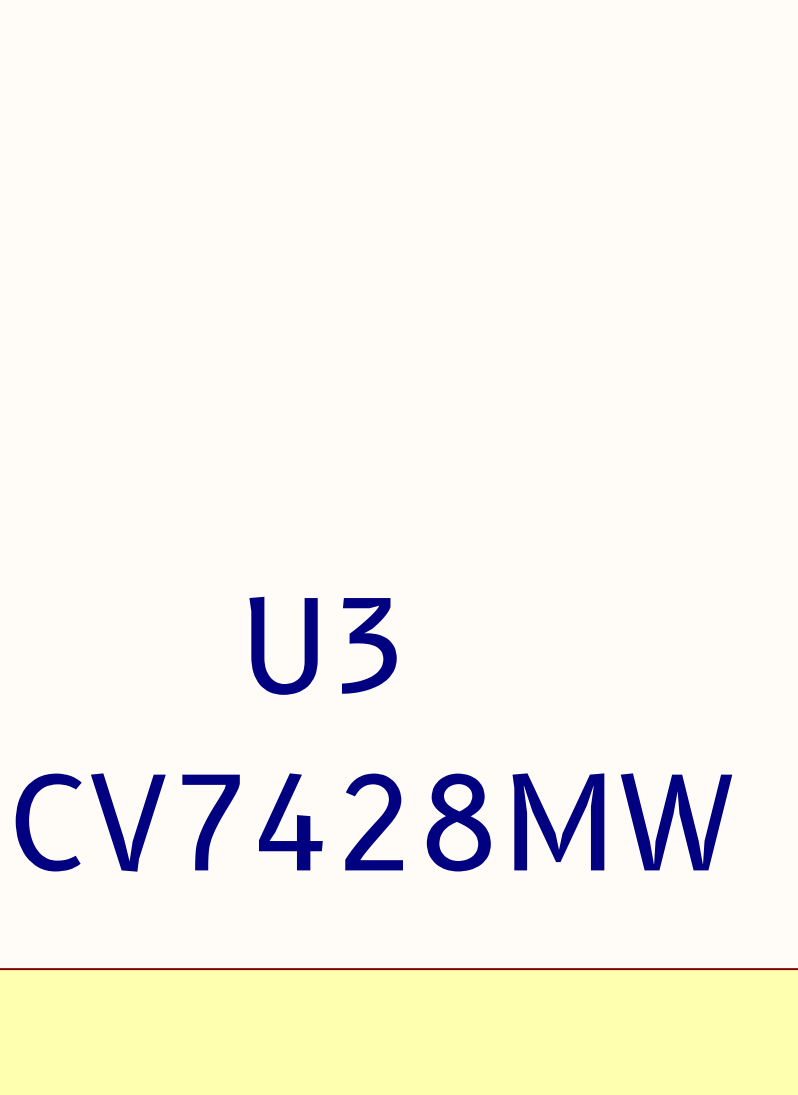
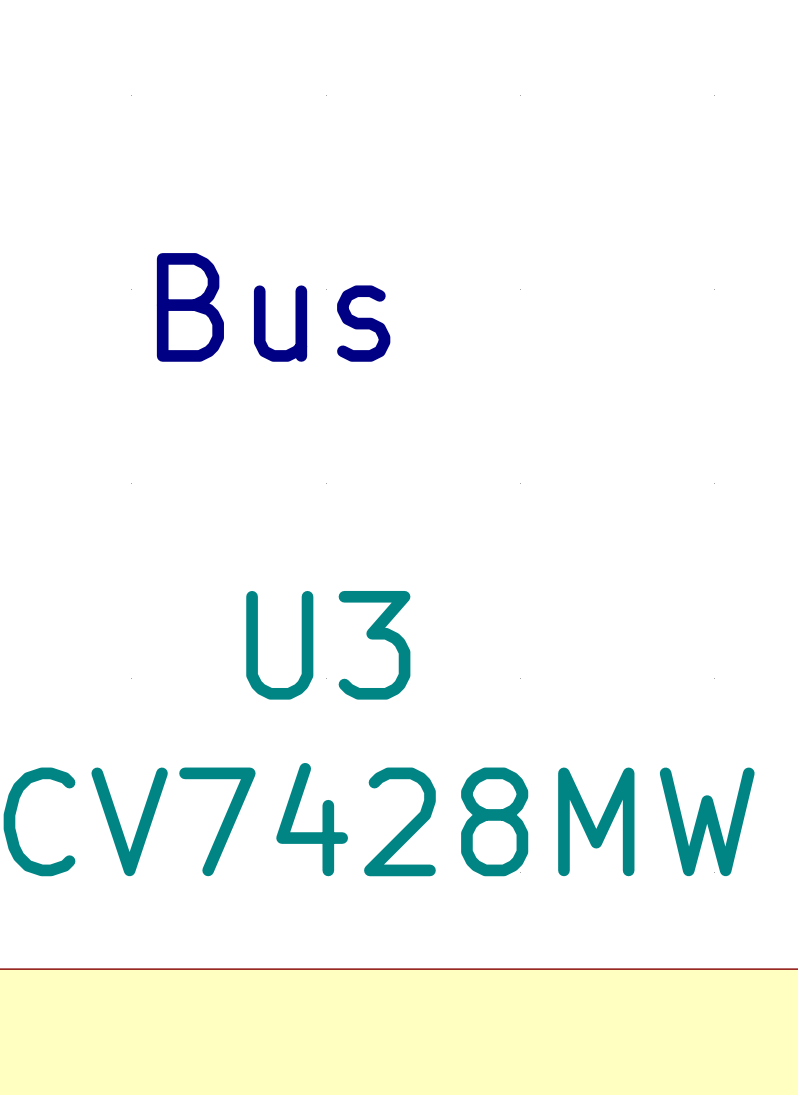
text: none -> Bus (273, 307)

